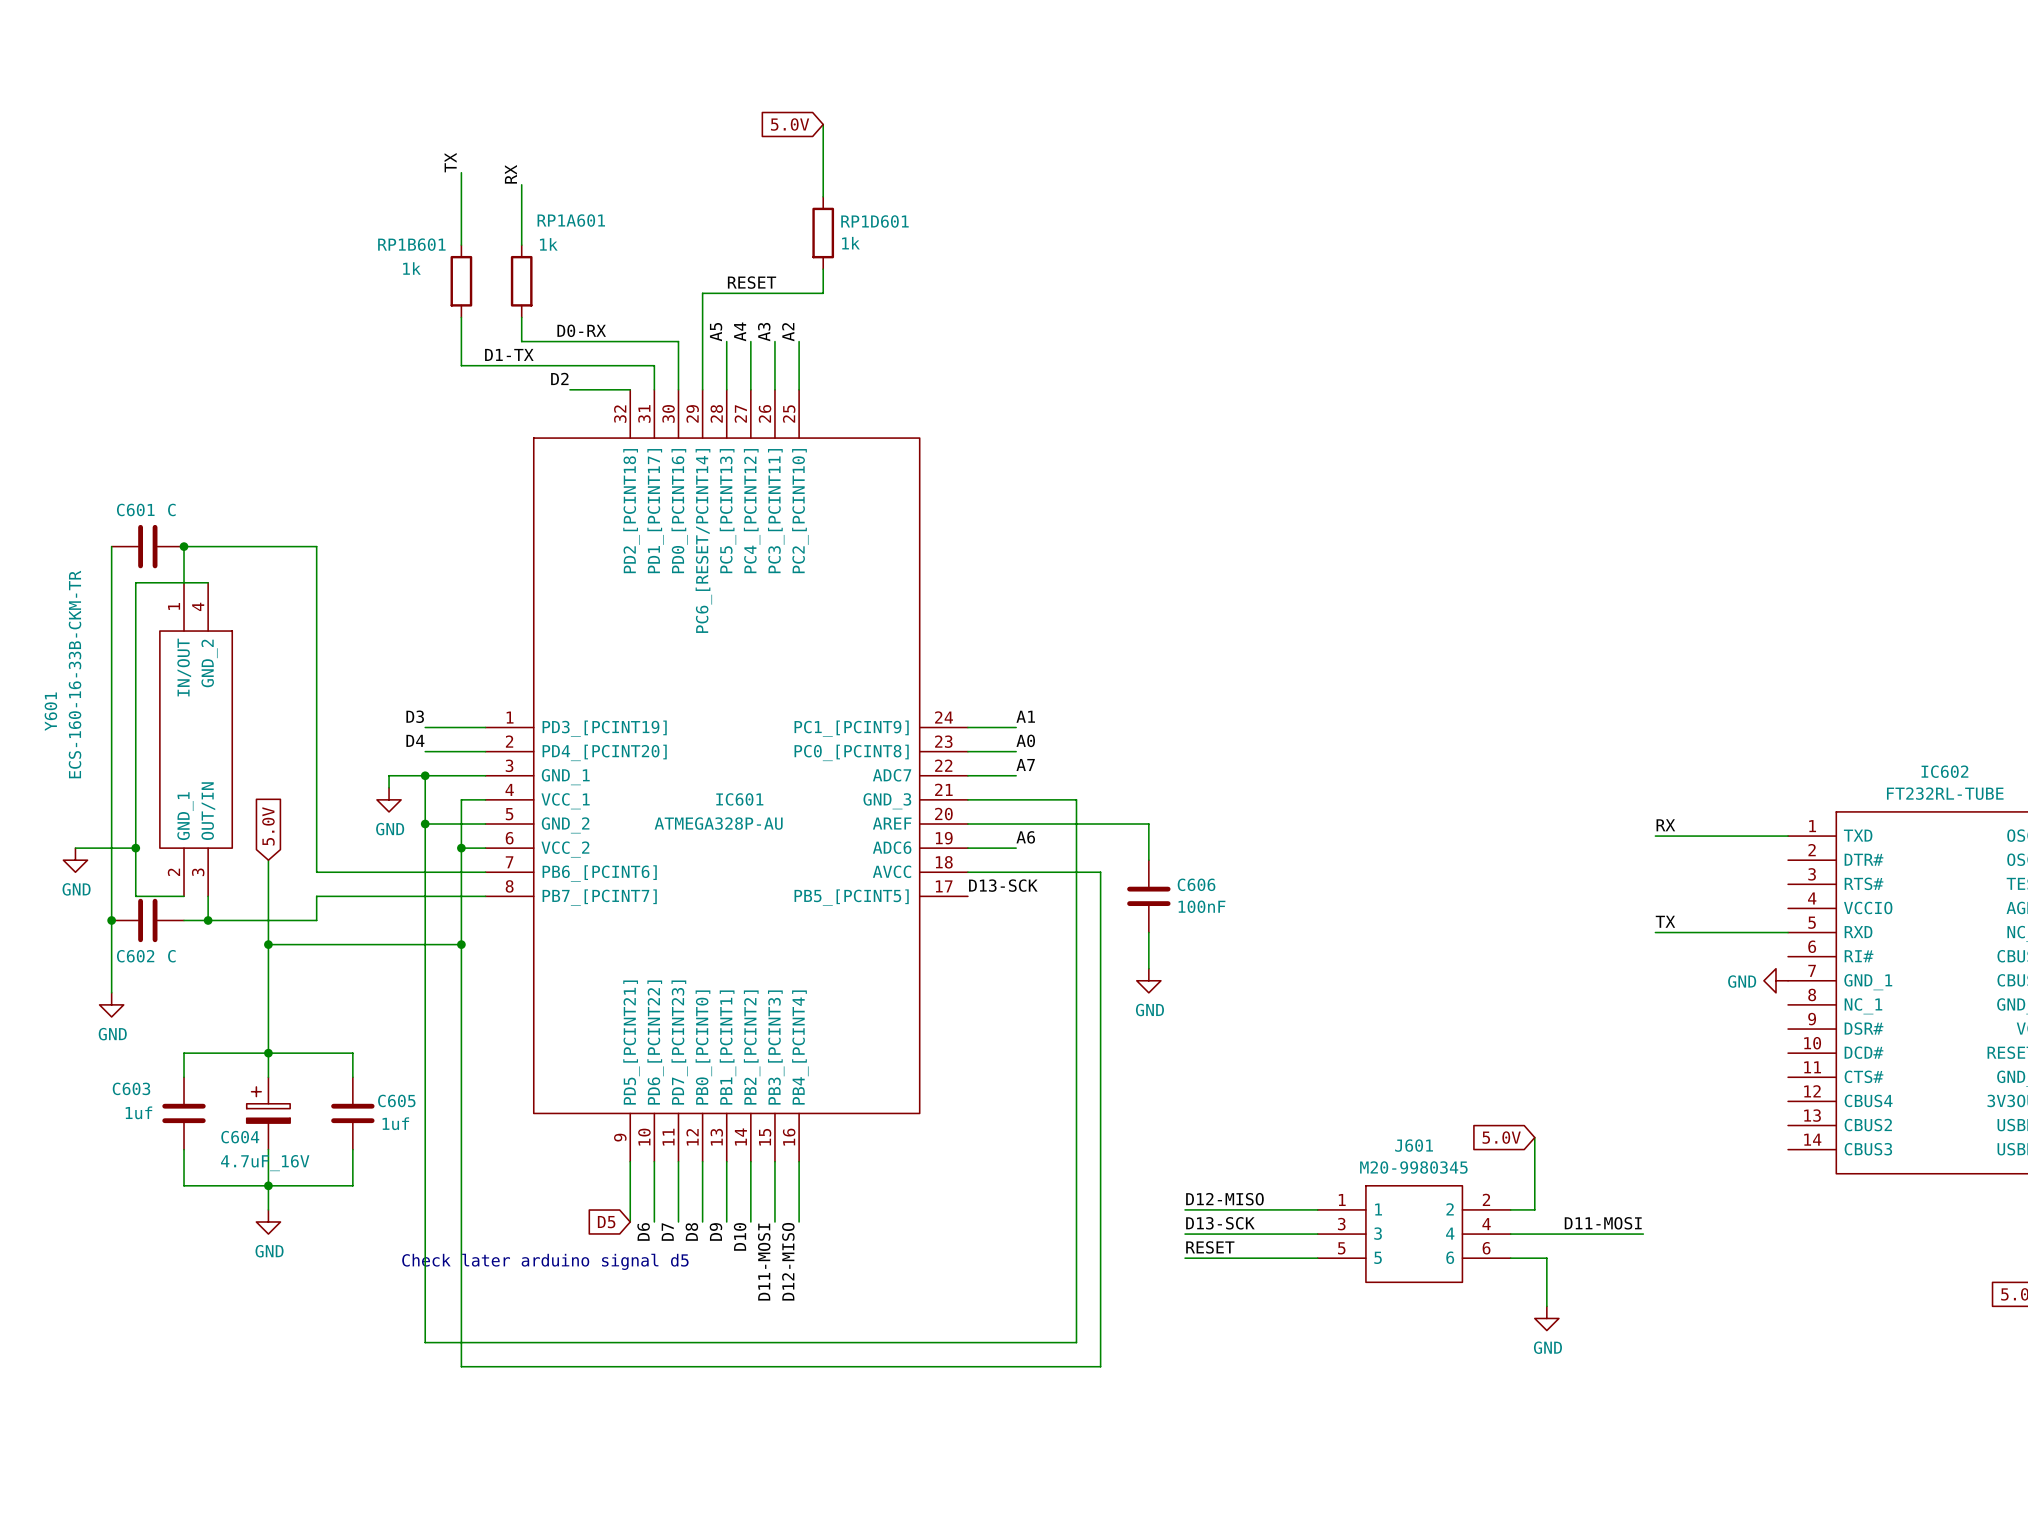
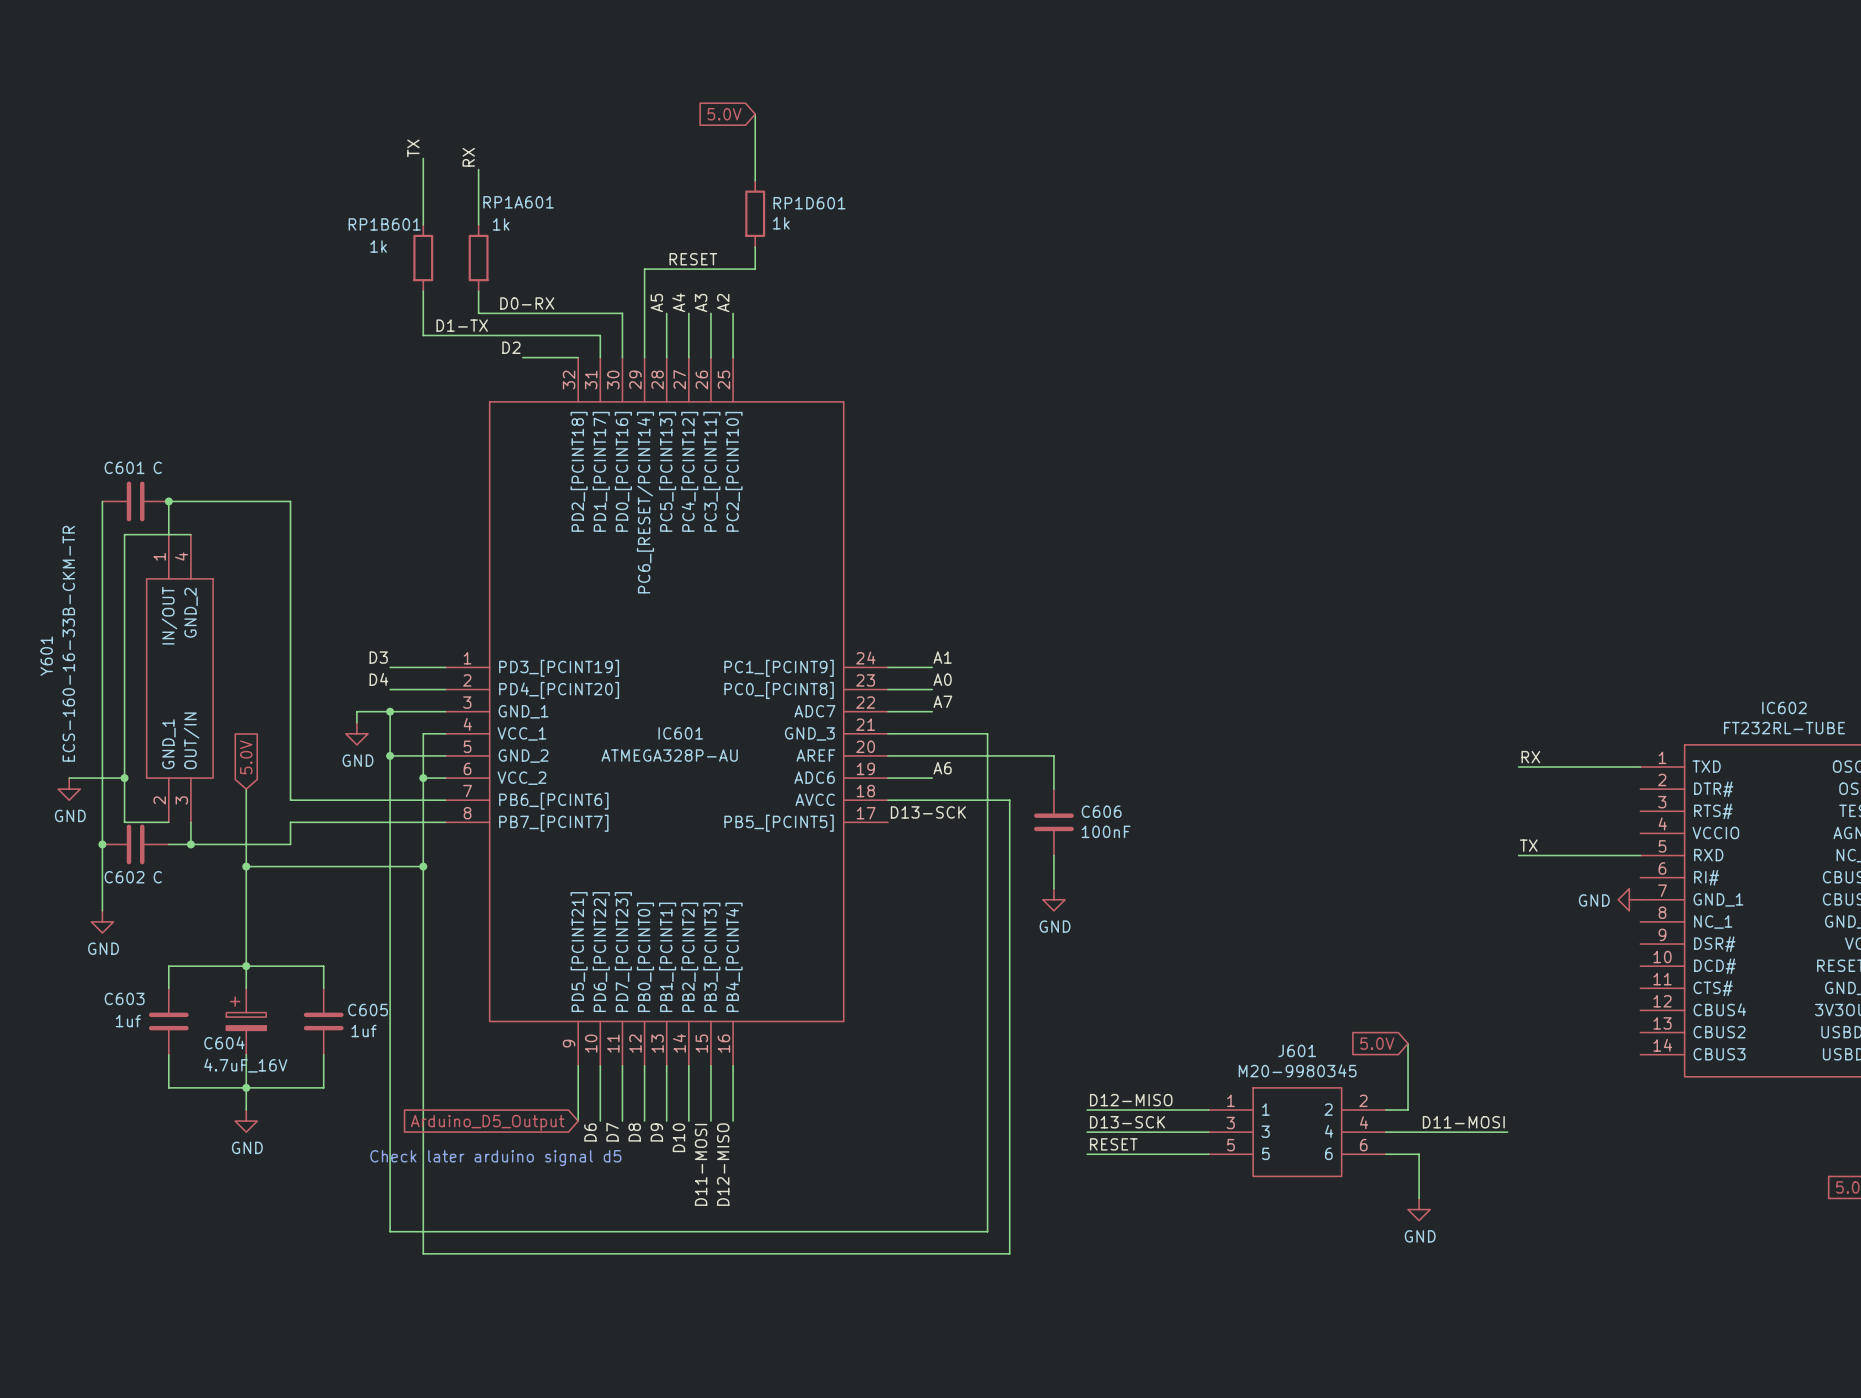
global label: D5 (606, 1222) -> Arduino_D5_Output (487, 1122)

